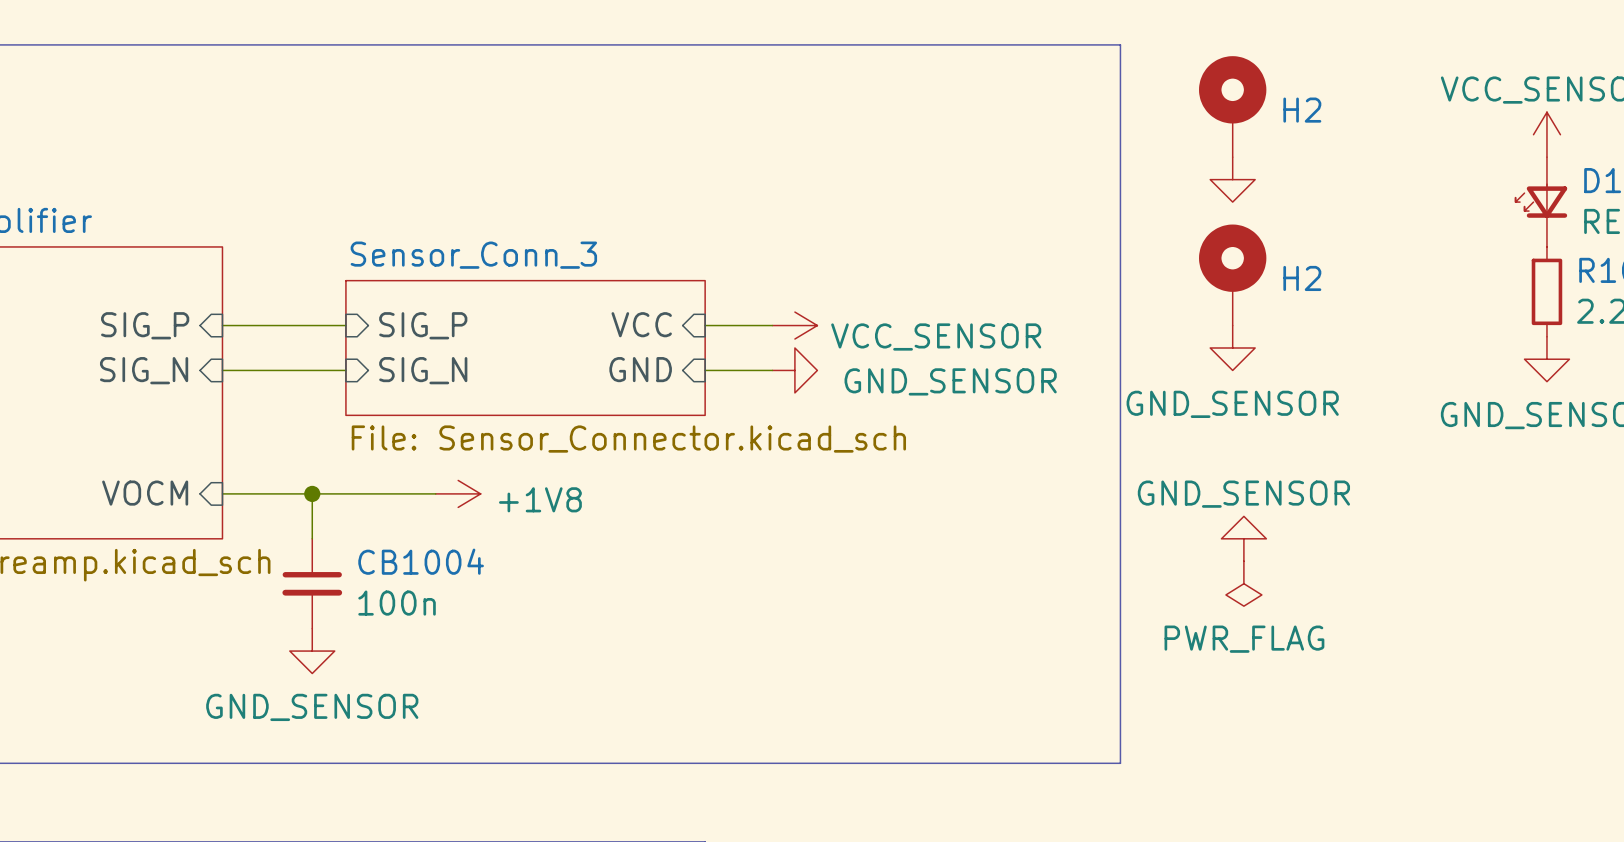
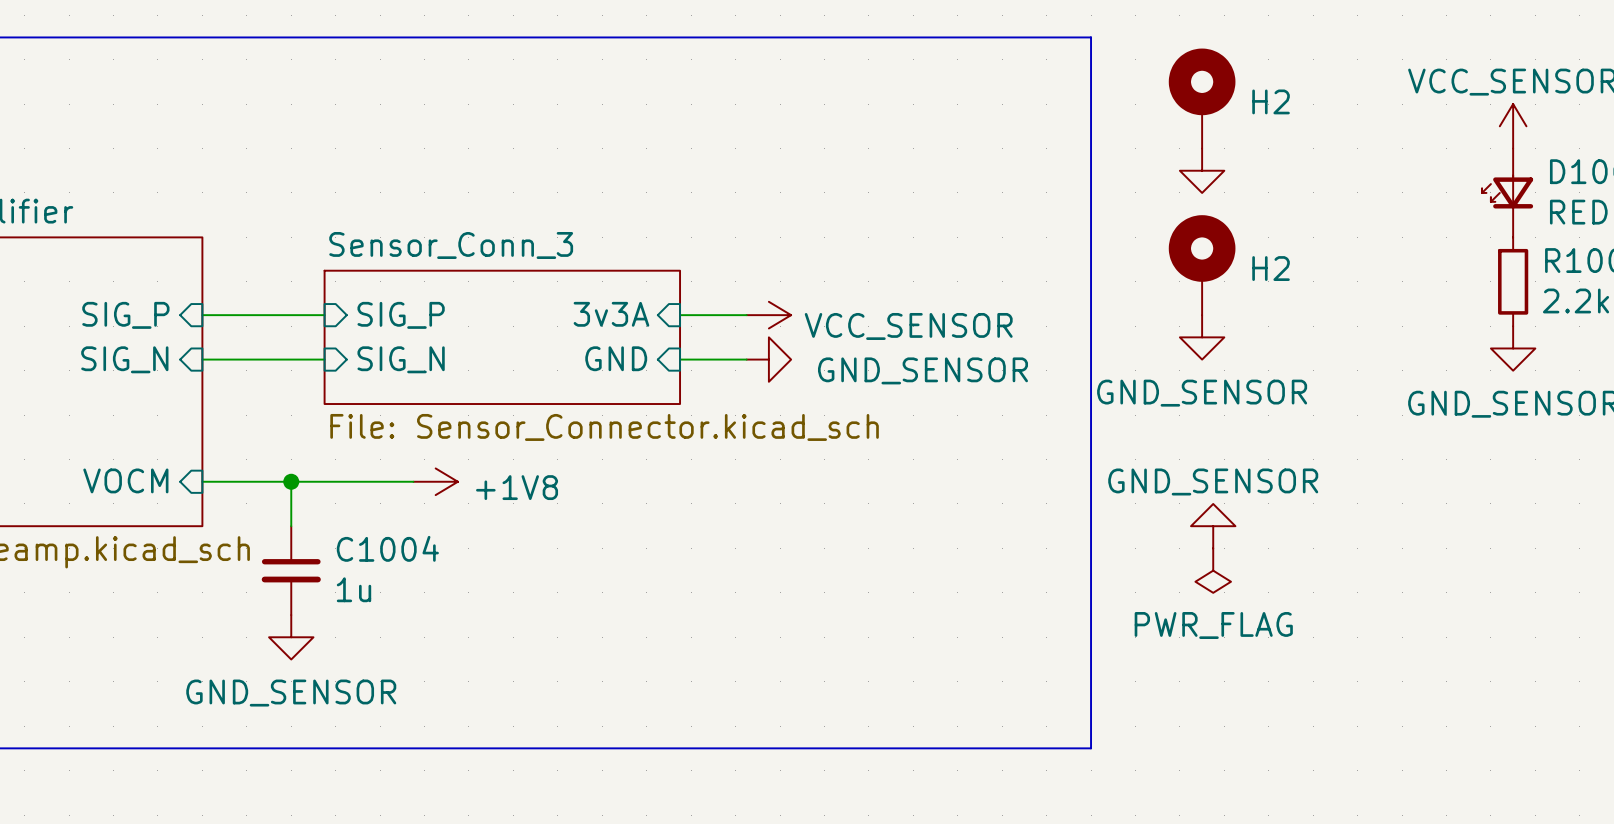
sheet pin: VCC (641, 324) -> 3v3A (611, 314)
CB1004 name: CB1004 (421, 561) -> C1004 (387, 548)
CB1004 value: 100n (397, 603) -> 1u (353, 589)

